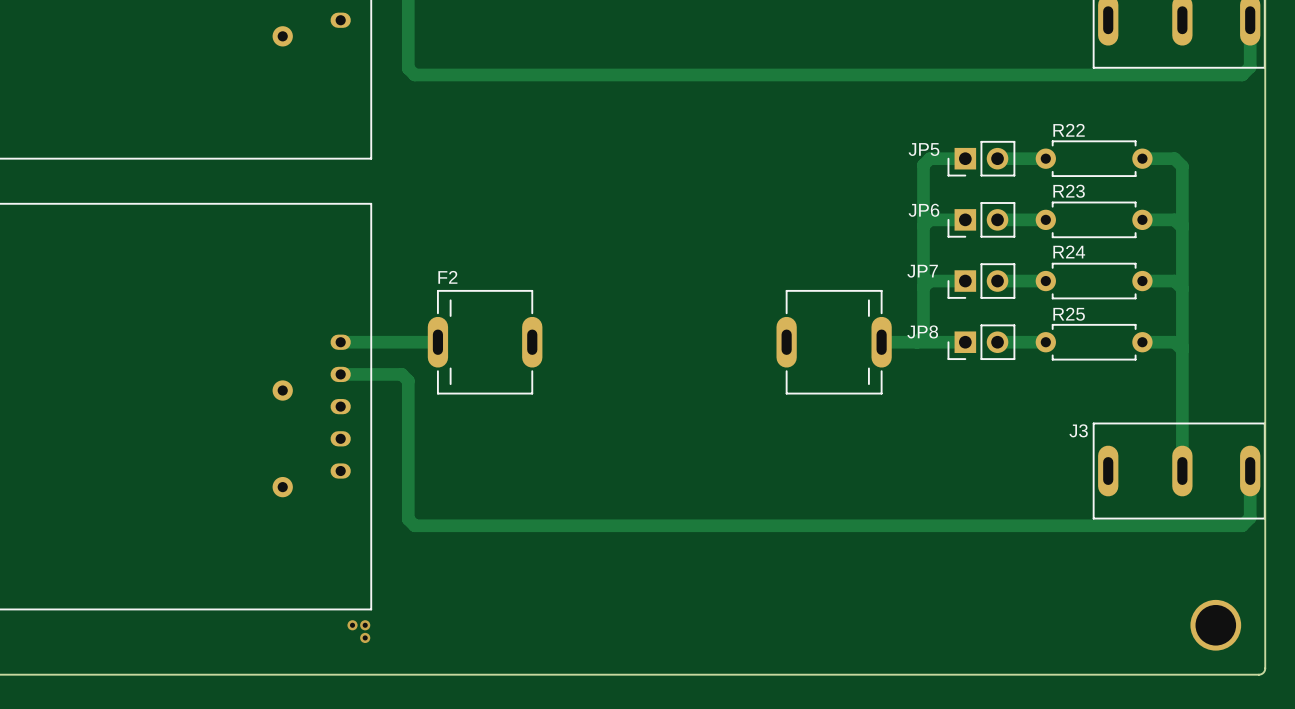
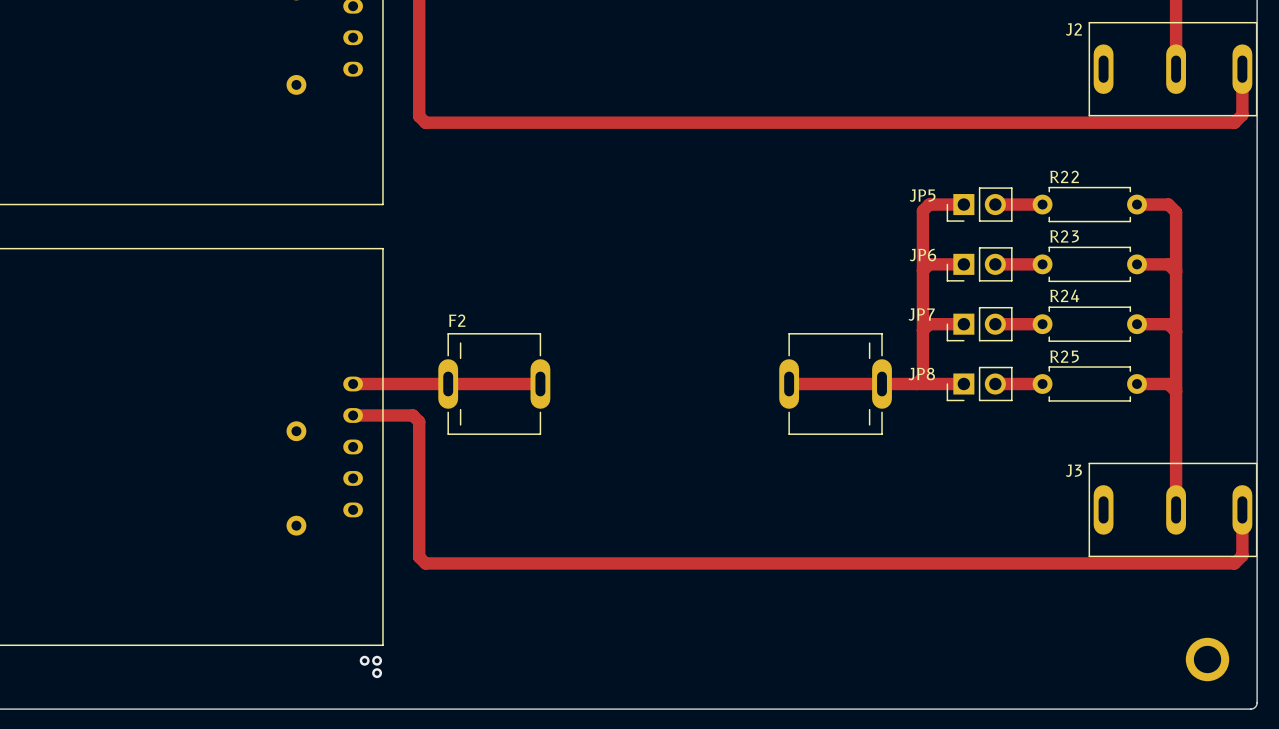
track: none -> (448, 384) (534, 384)
track: none -> (795, 384) (882, 384)
part footprint: [1190, 599, 1242, 651] -> [1185, 637, 1230, 682]

